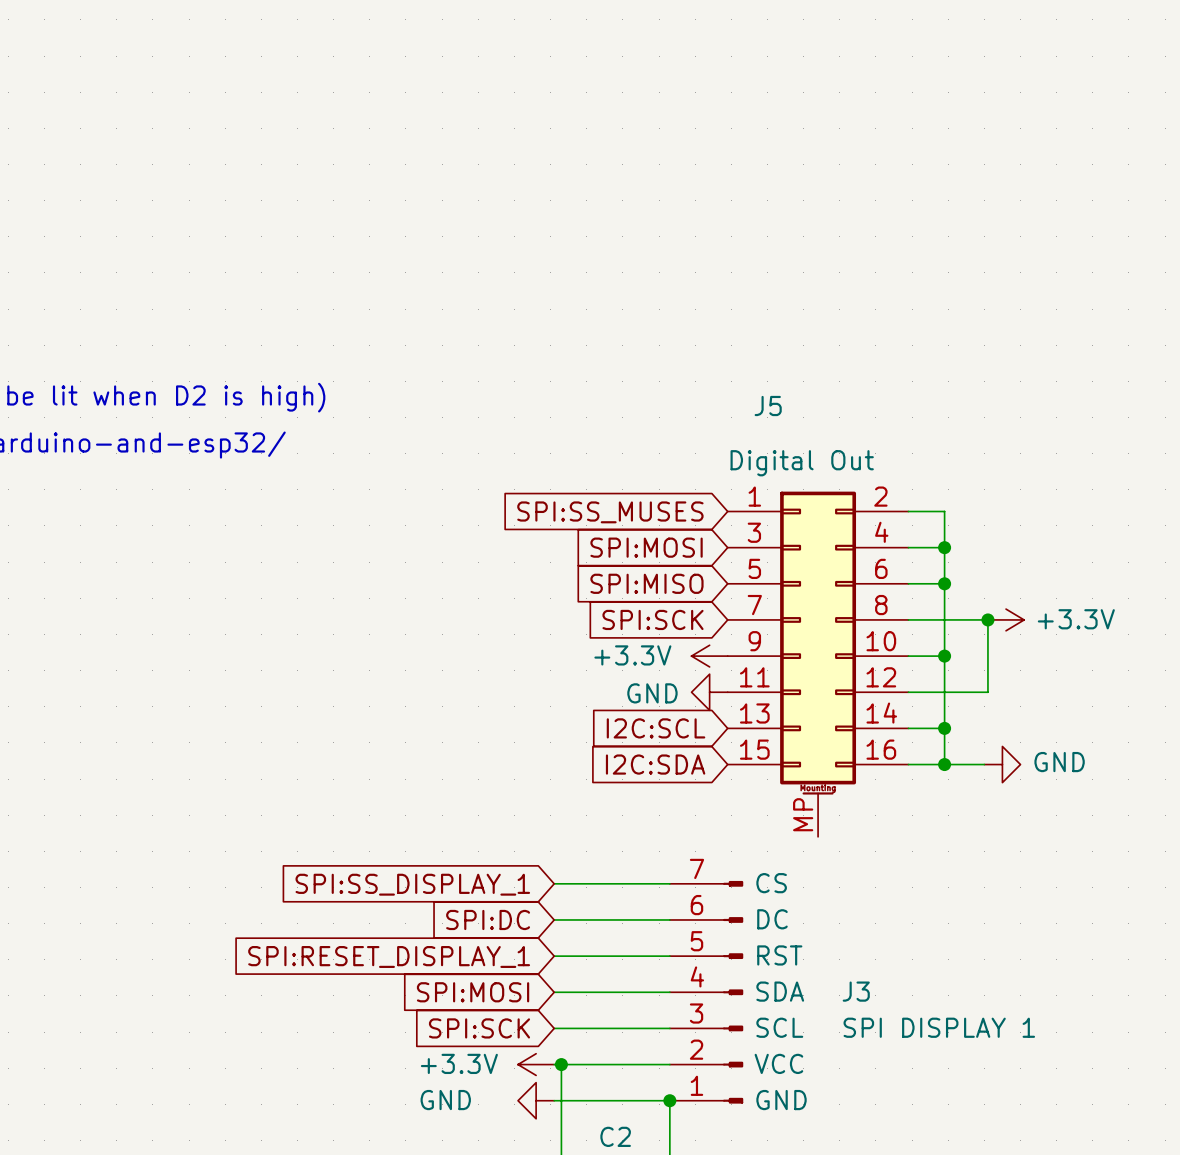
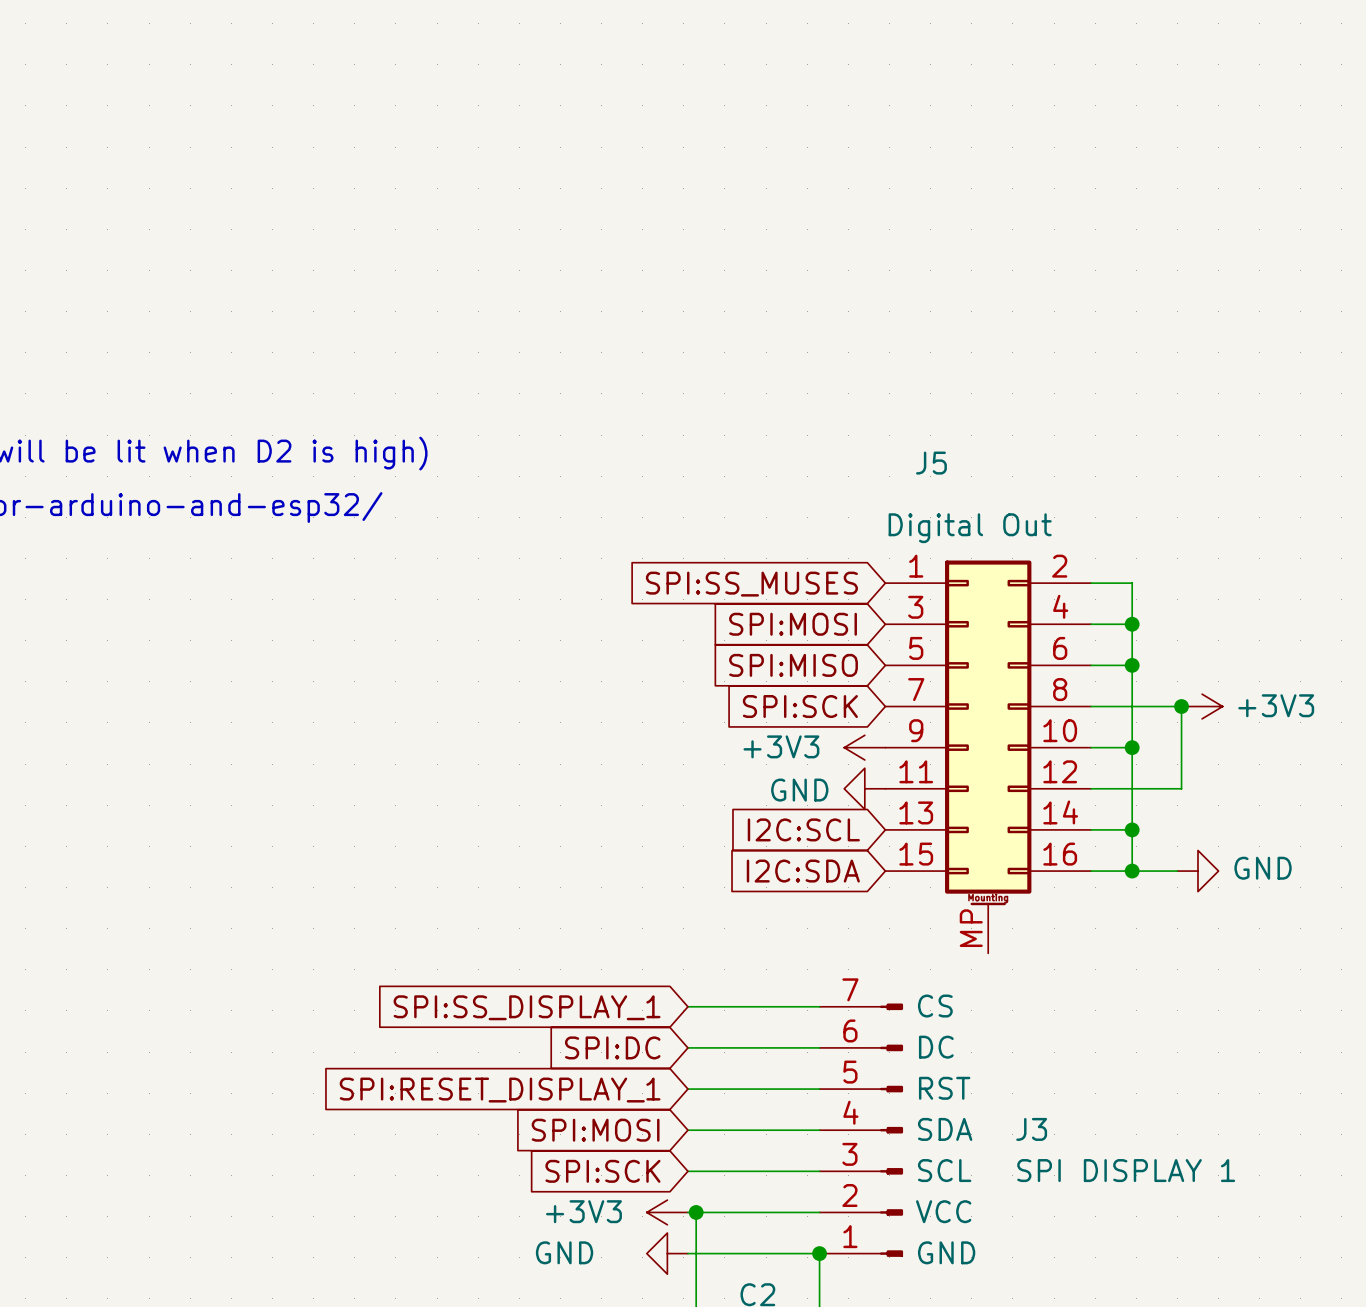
power symbol: +3.3V (1006, 619) -> +3V3 (1202, 706)
power symbol: +3.3V (709, 656) -> +3V3 (864, 747)
power symbol: +3.3V (536, 1064) -> +3V3 (667, 1212)

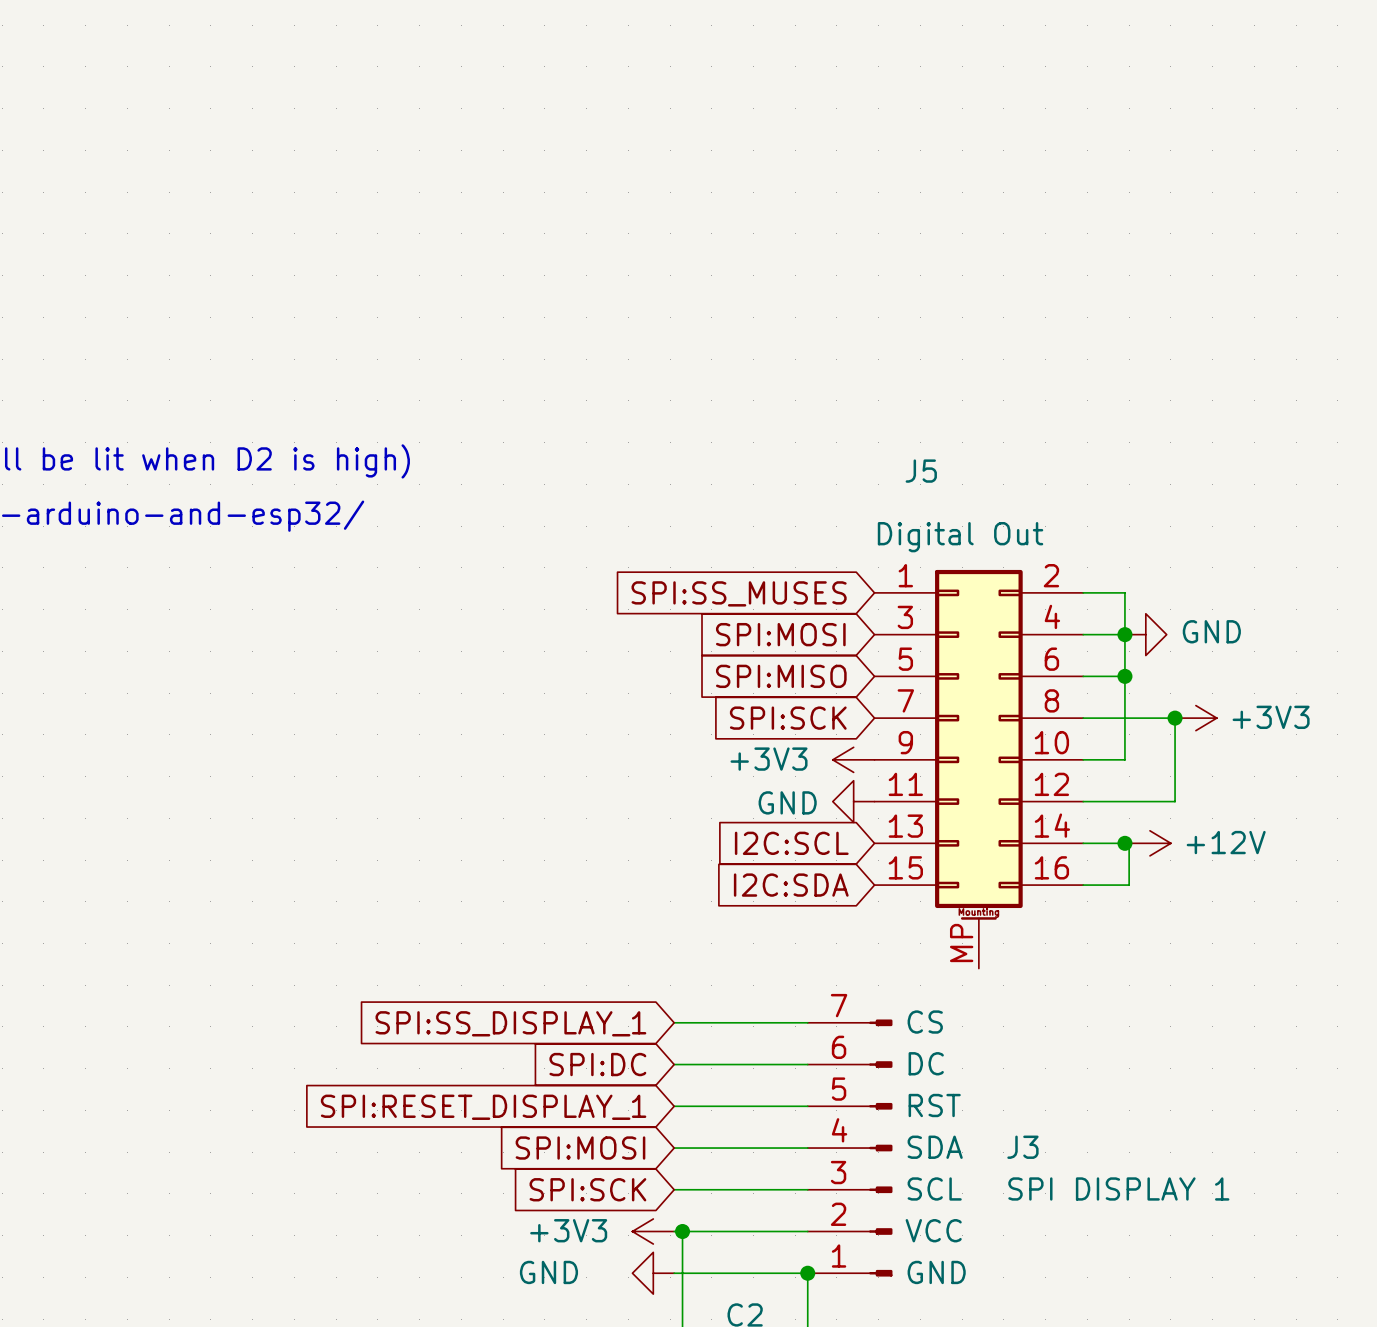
wire: (1132, 747) (1132, 871) -> none
junction: (1132, 747) -> none
power symbol: none -> +12V (1150, 843)
junction: (1132, 871) -> none
wire: (1136, 871) (1177, 871) -> (1129, 885) (1129, 843) (1124, 843)
power symbol position: GND (1197, 871) -> GND (1145, 634)

